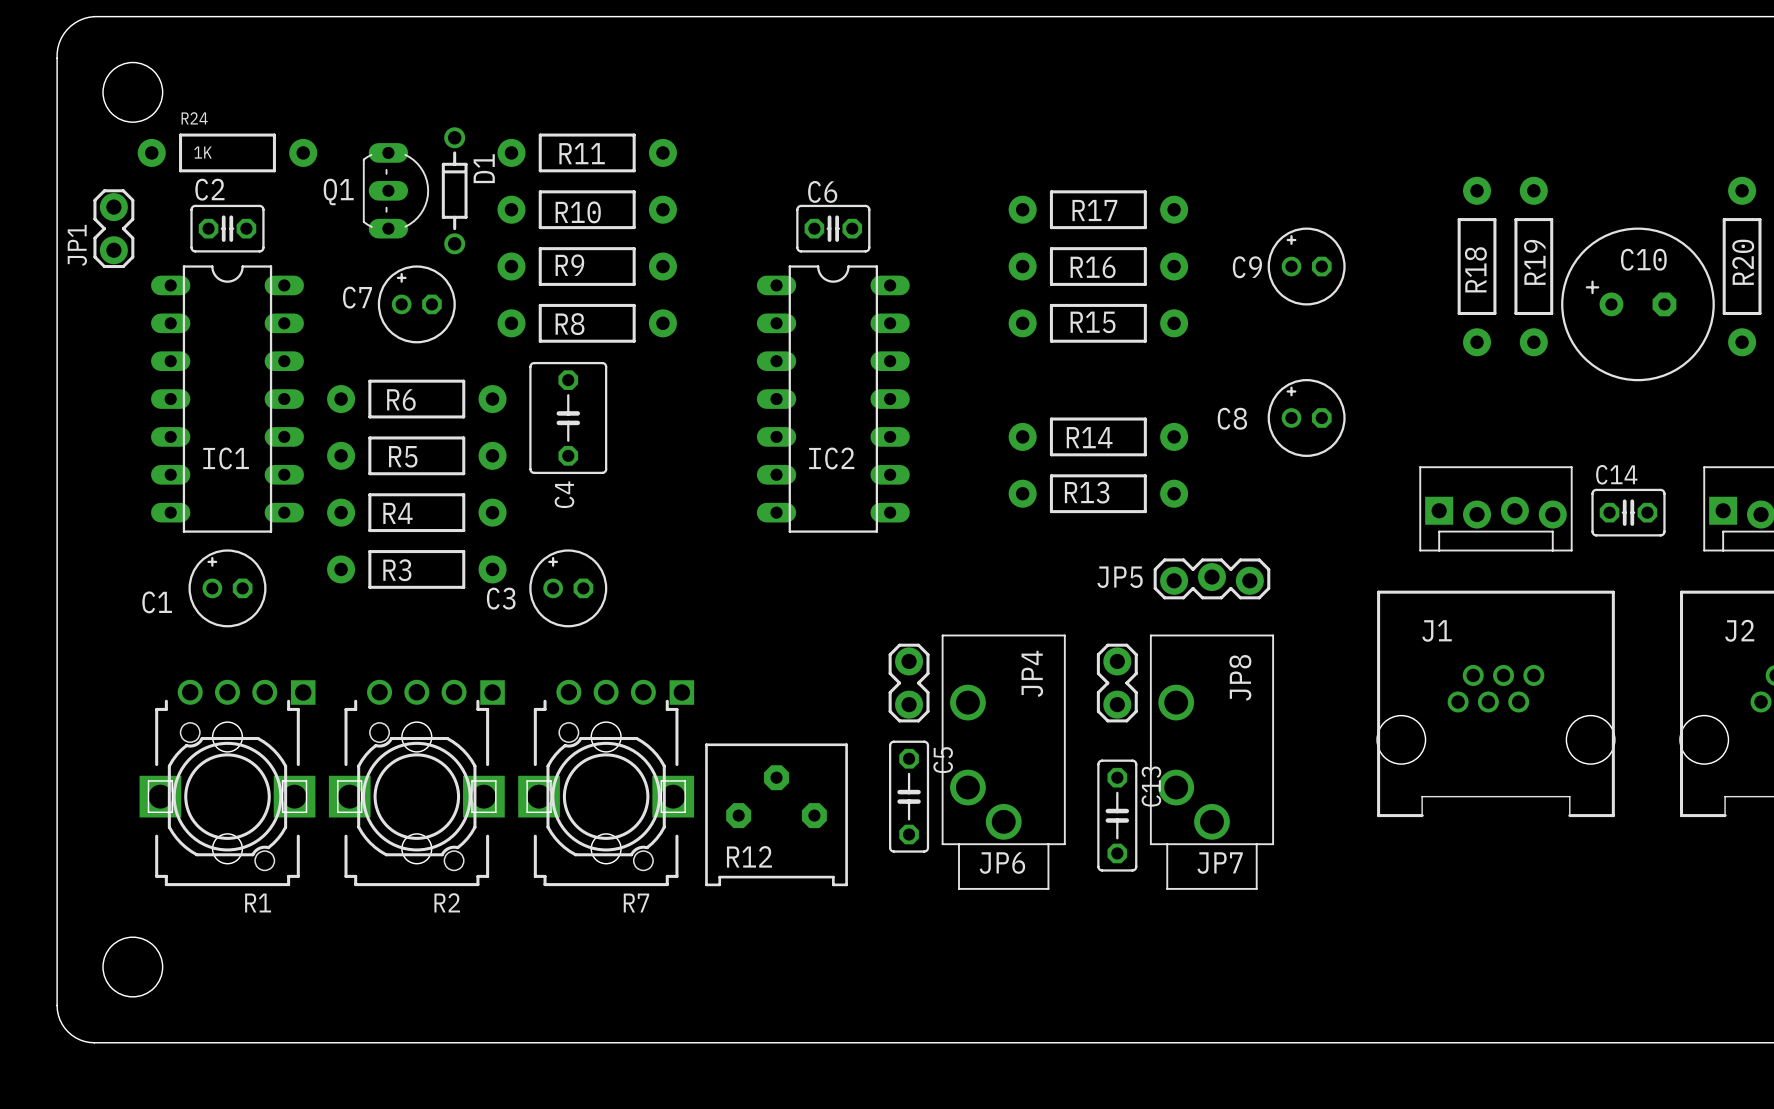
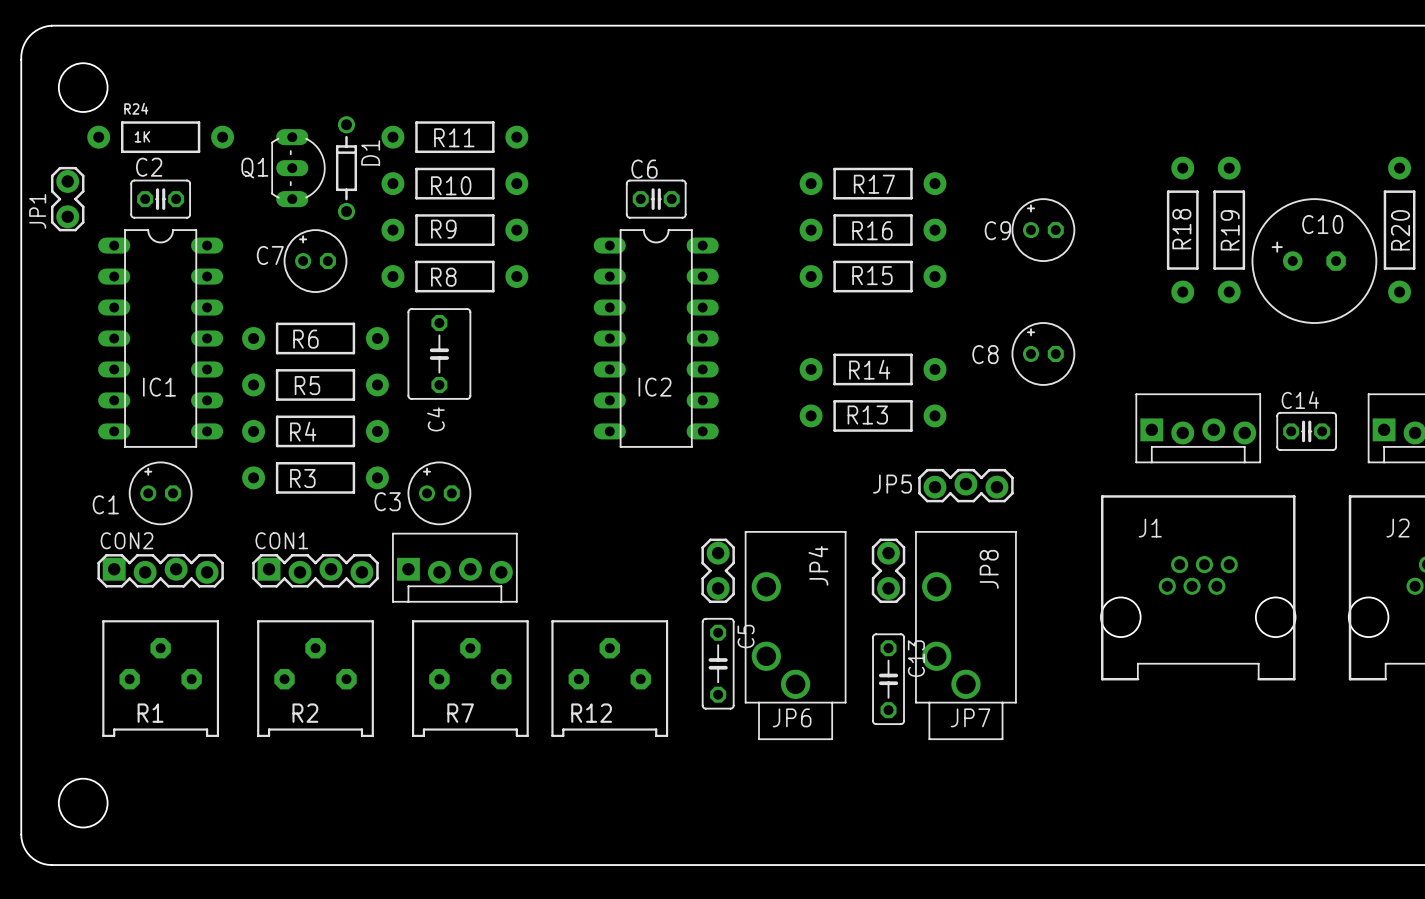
R1 footprint: [139, 679, 316, 887] -> [102, 620, 220, 737]
R2 footprint: [328, 679, 505, 887] -> [257, 620, 374, 737]
R7 footprint: [518, 679, 695, 887] -> [411, 620, 529, 737]
part: none -> (454, 567)
CON2: none -> (160, 570)
CON1: none -> (315, 570)
R2 name position: R2 (447, 902) -> R2 (305, 713)
R1 name position: R1 (258, 903) -> R1 (150, 713)
R7 name position: R7 (636, 903) -> R7 (460, 713)

